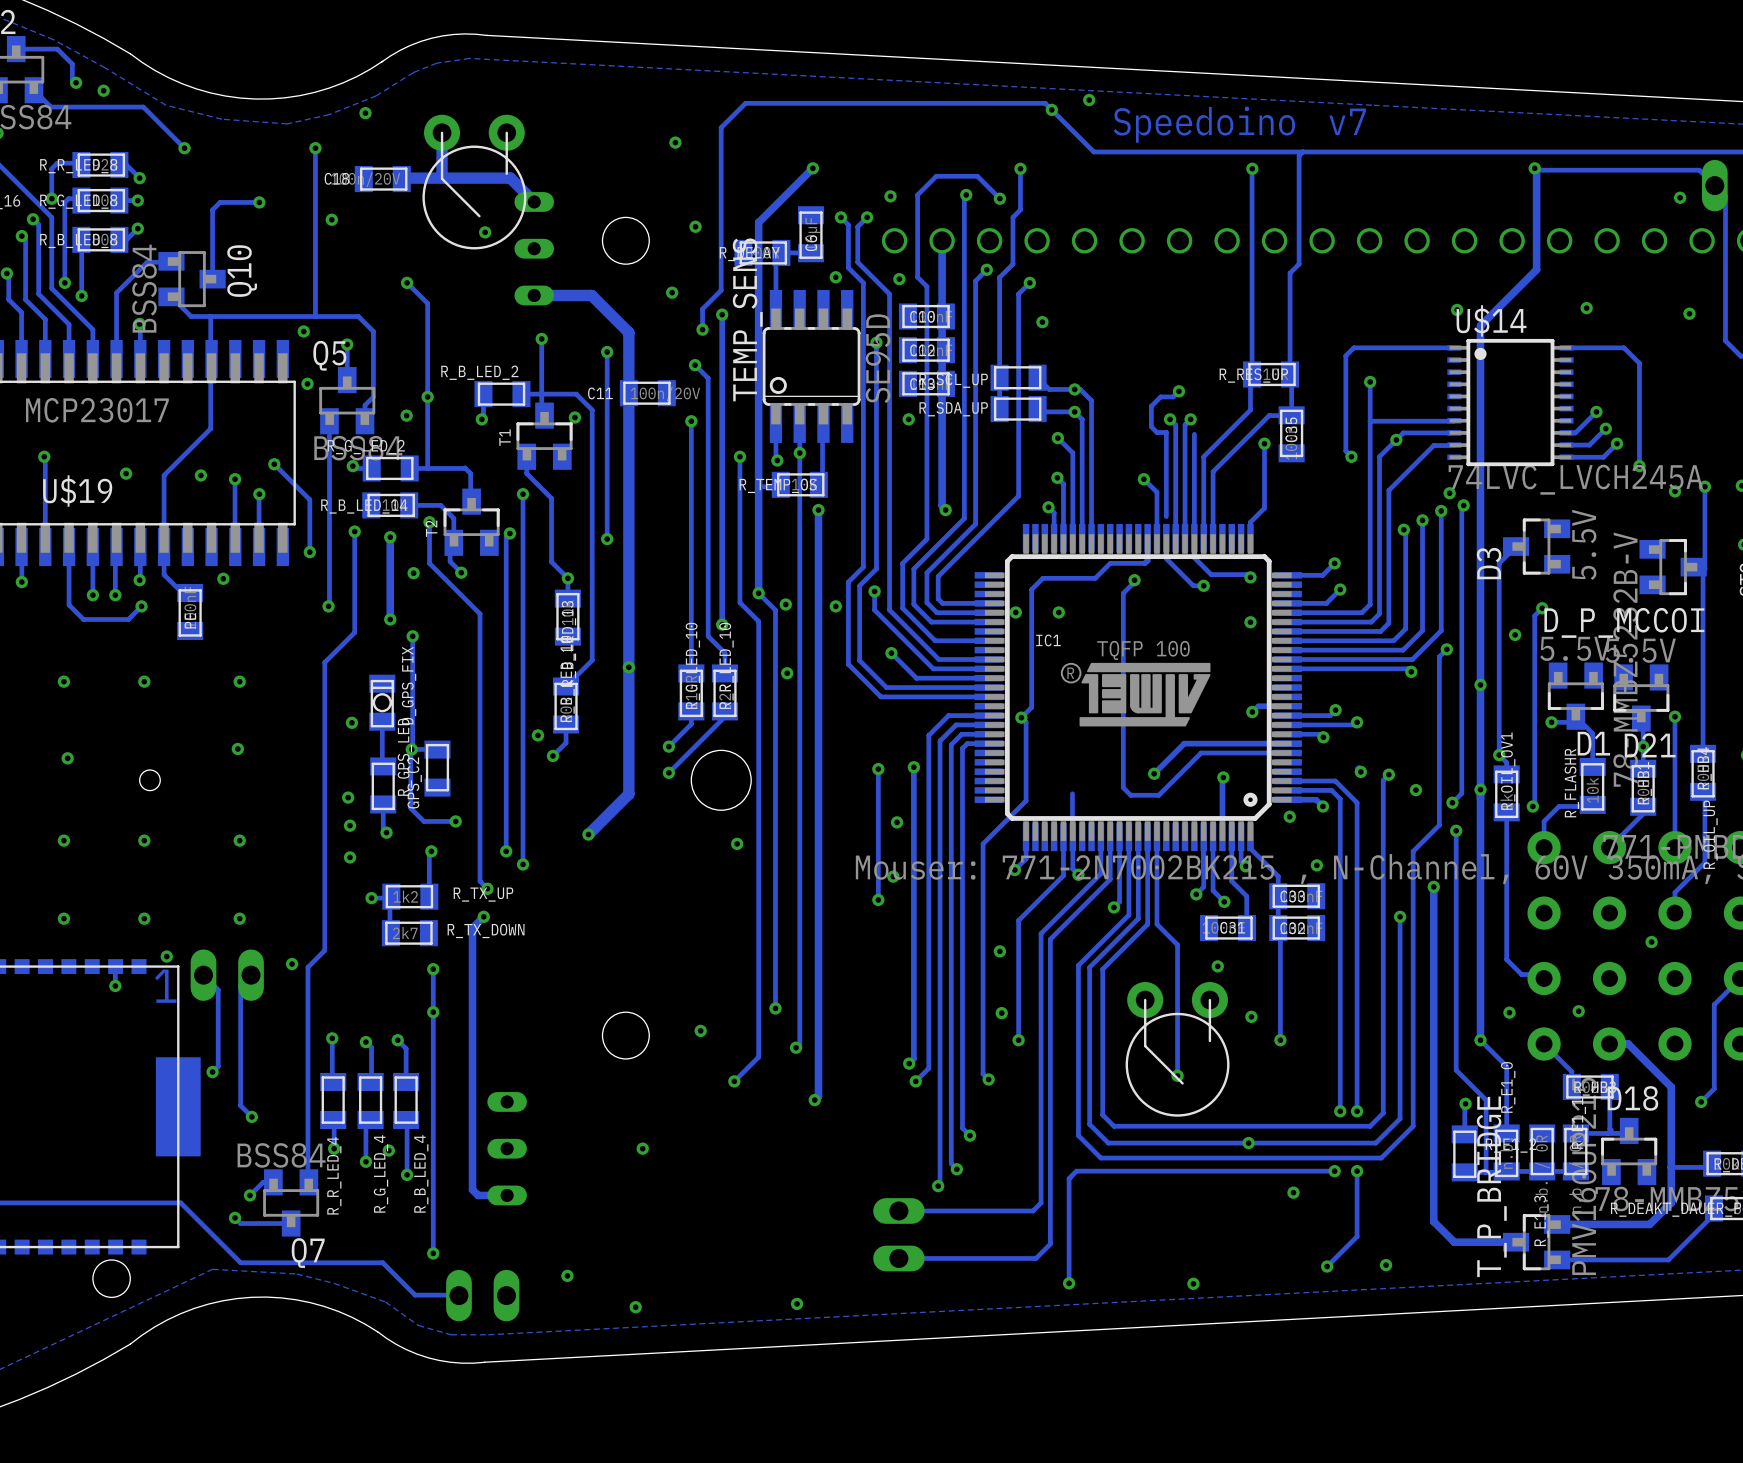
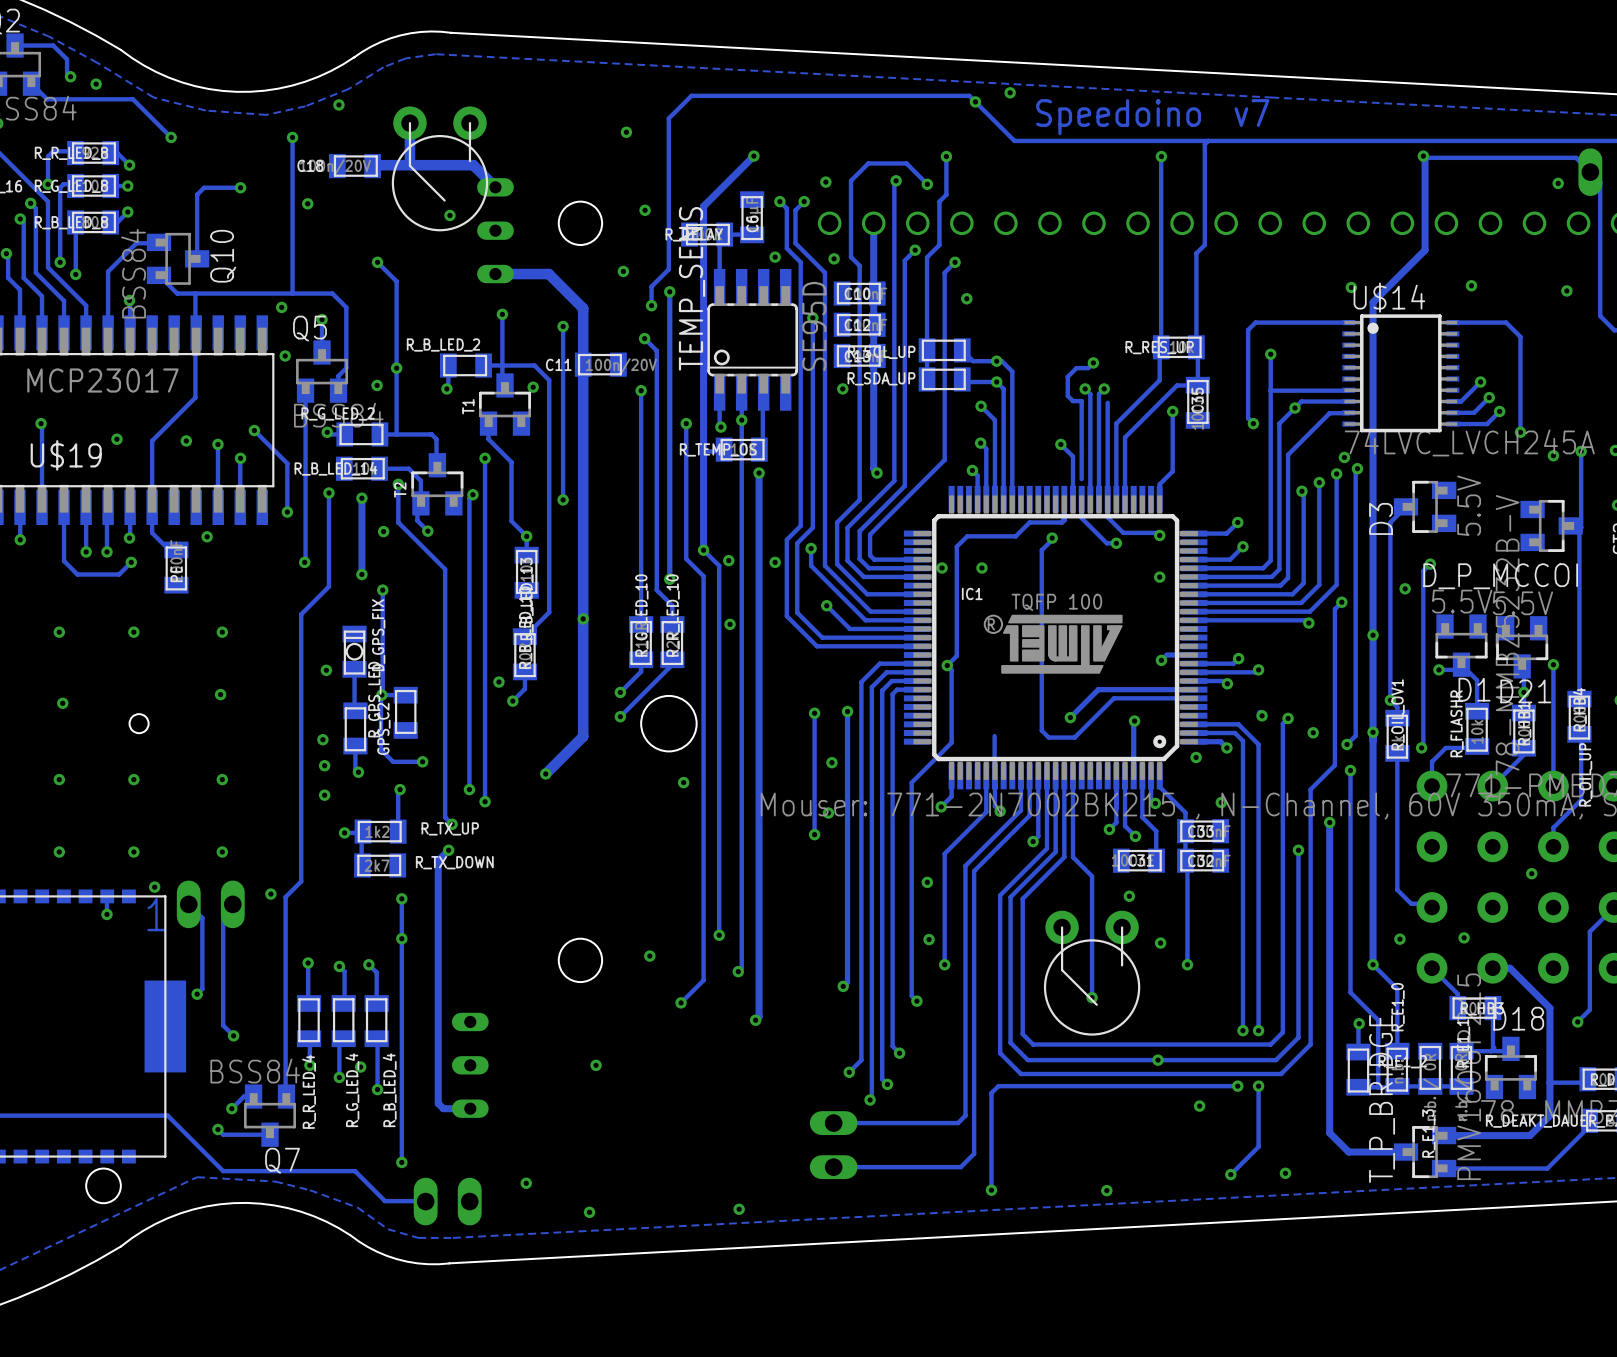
track: (928, 1068) (915, 1081) -> (861, 990) (861, 1060) (849, 1072)
via position: (915, 1081) -> (849, 1072)

